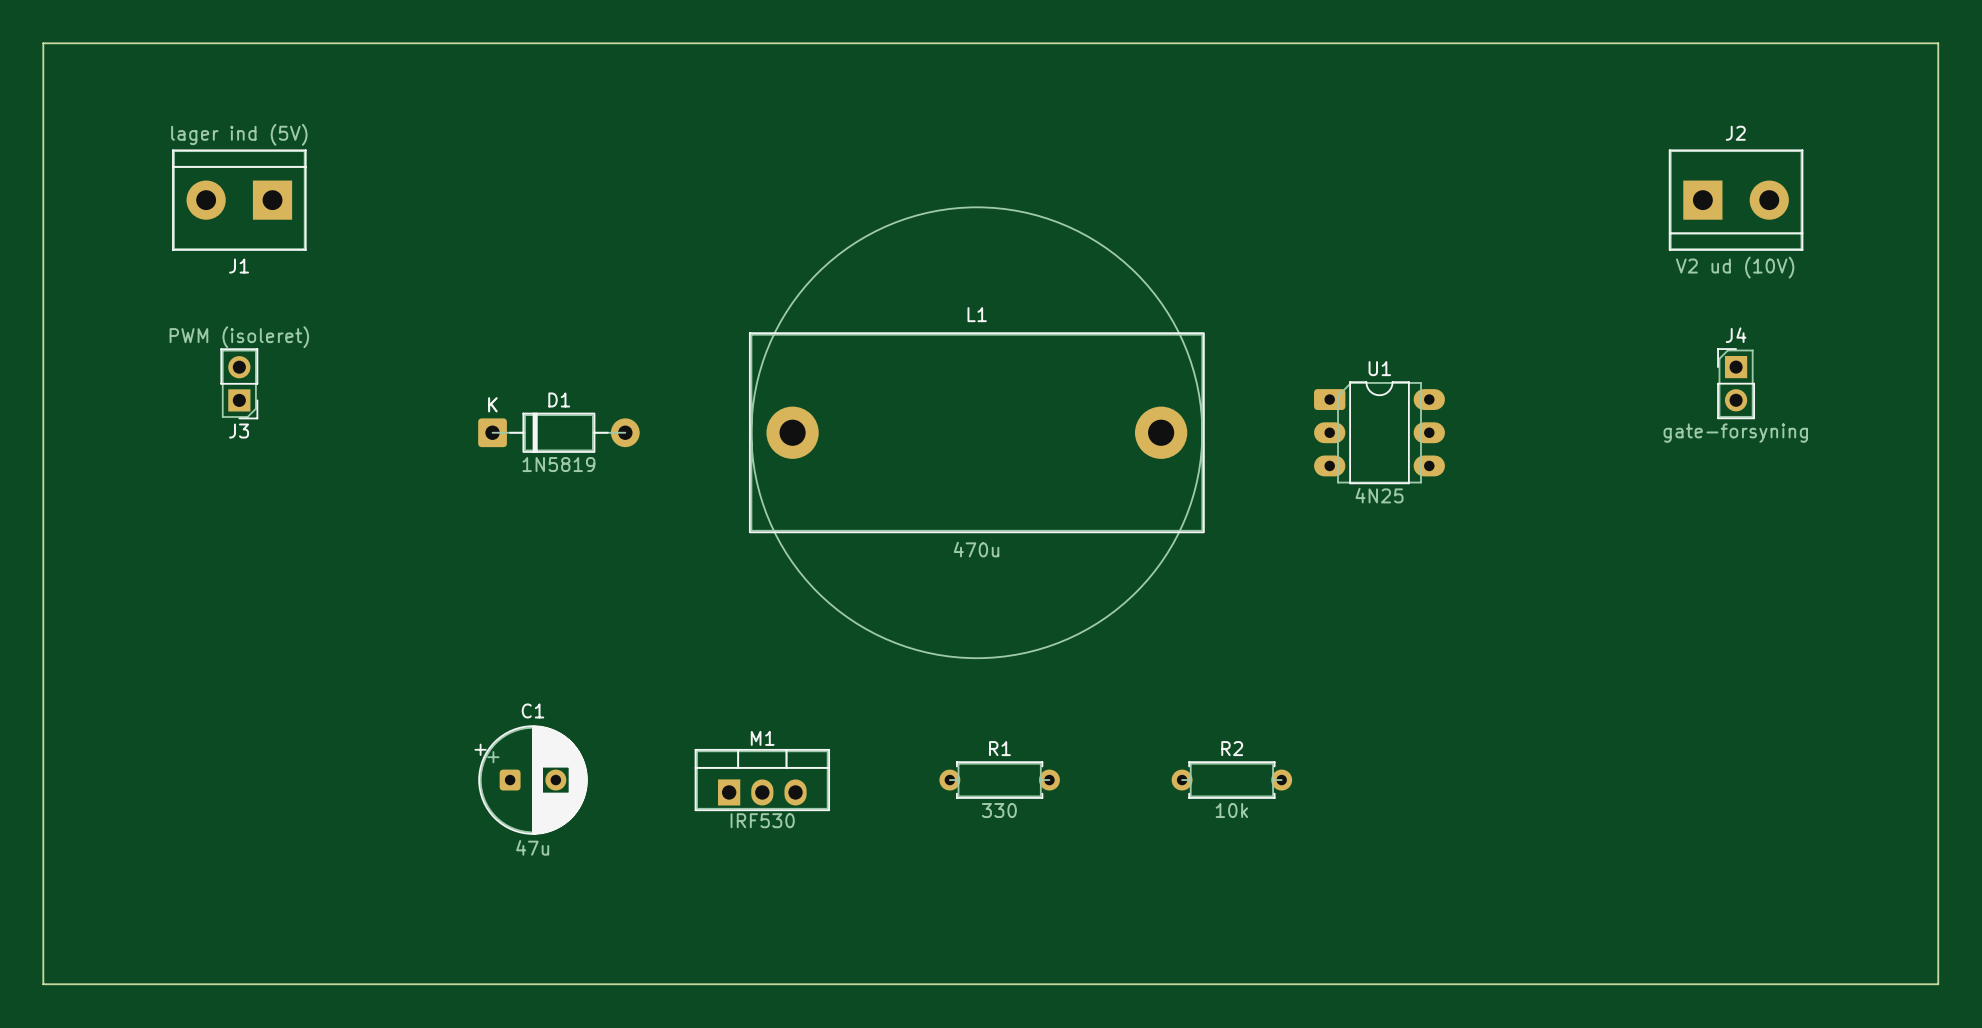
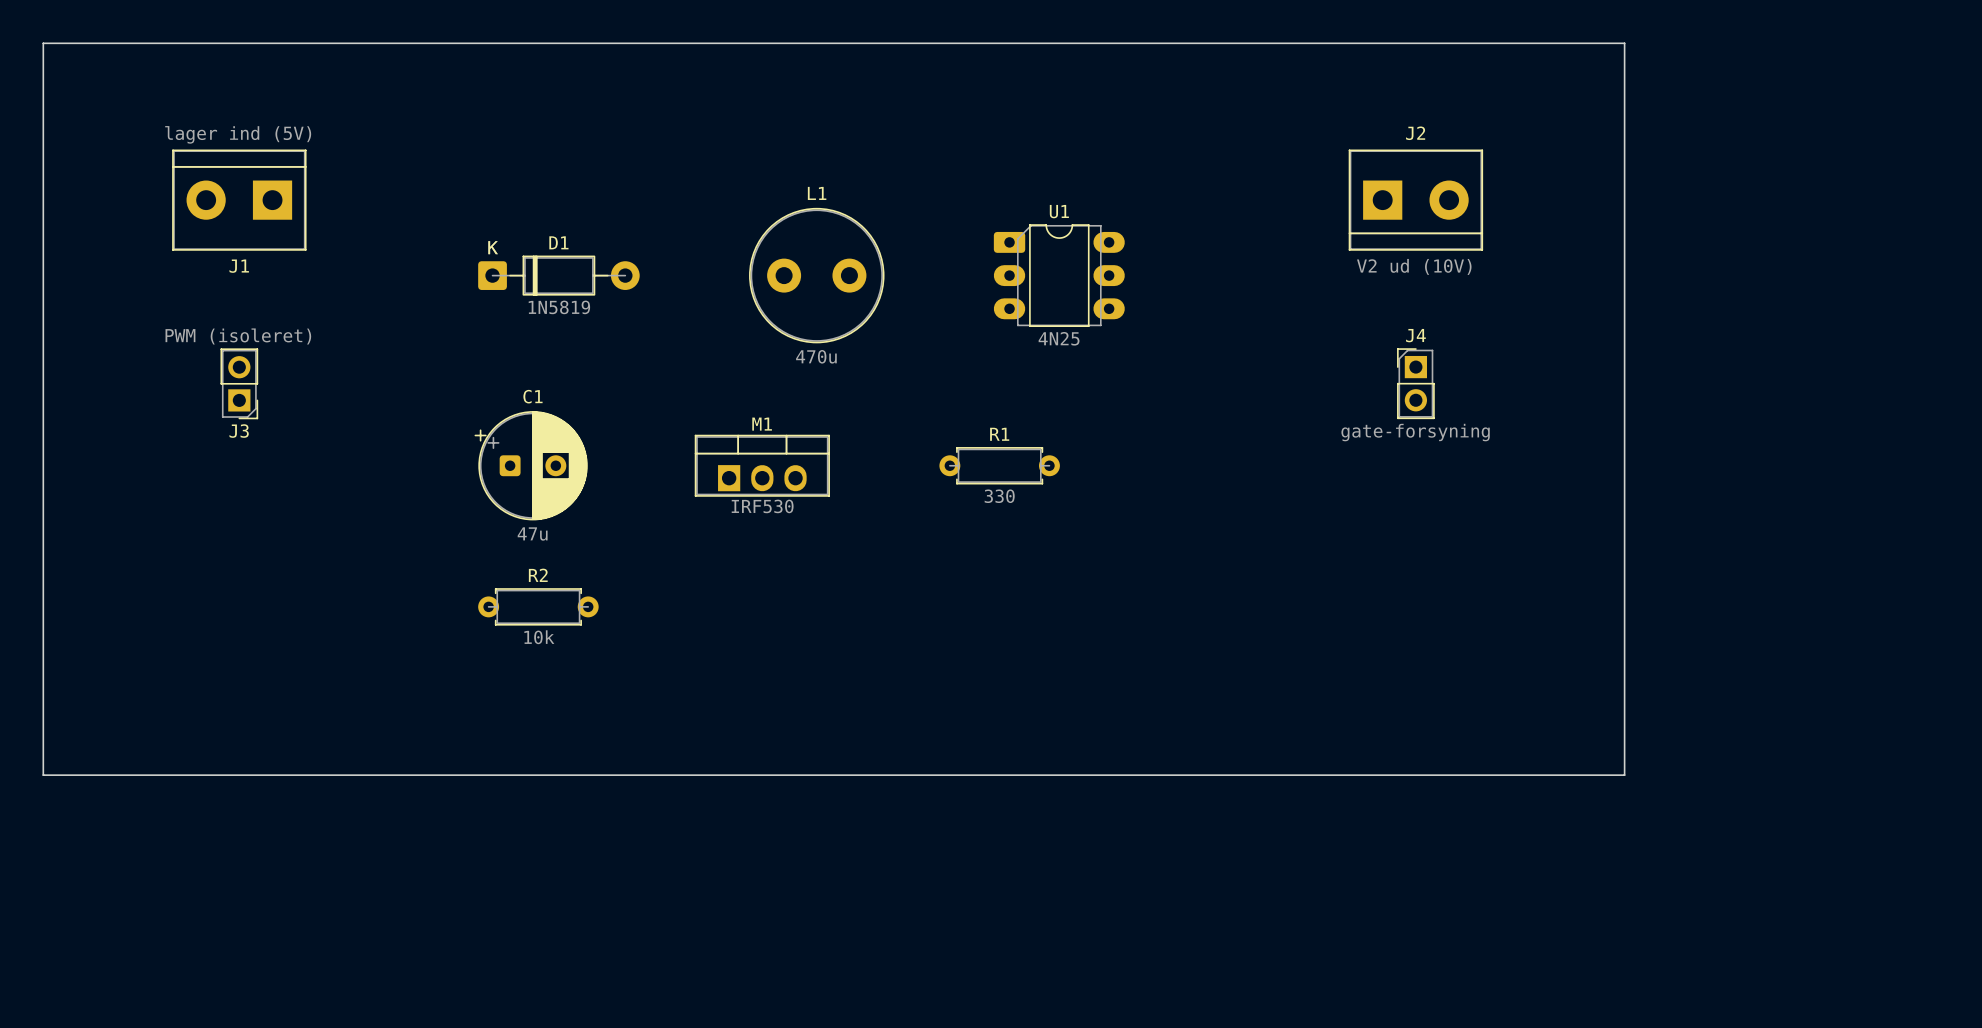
board edge: (1624, 43) (1938, 43) (1938, 984) (43, 984) (43, 775) -> (1624, 43) (1624, 775) (43, 775)
J2 position: (1736, 200) -> (1415, 200)
L1 footprint: [749, 206, 1205, 659] -> [749, 207, 885, 344]
L1 name position: L1 (977, 314) -> L1 (817, 193)
J4 position: (1736, 383) -> (1415, 383)
D1 position: (558, 432) -> (558, 275)
U1 position: (1379, 432) -> (1059, 275)
L1 value position: 470u (976, 549) -> 470u (816, 356)
C1 position: (531, 780) -> (531, 465)
M1 position: (762, 780) -> (762, 465)
R1 position: (999, 780) -> (999, 465)
R2 position: (1231, 780) -> (538, 606)

